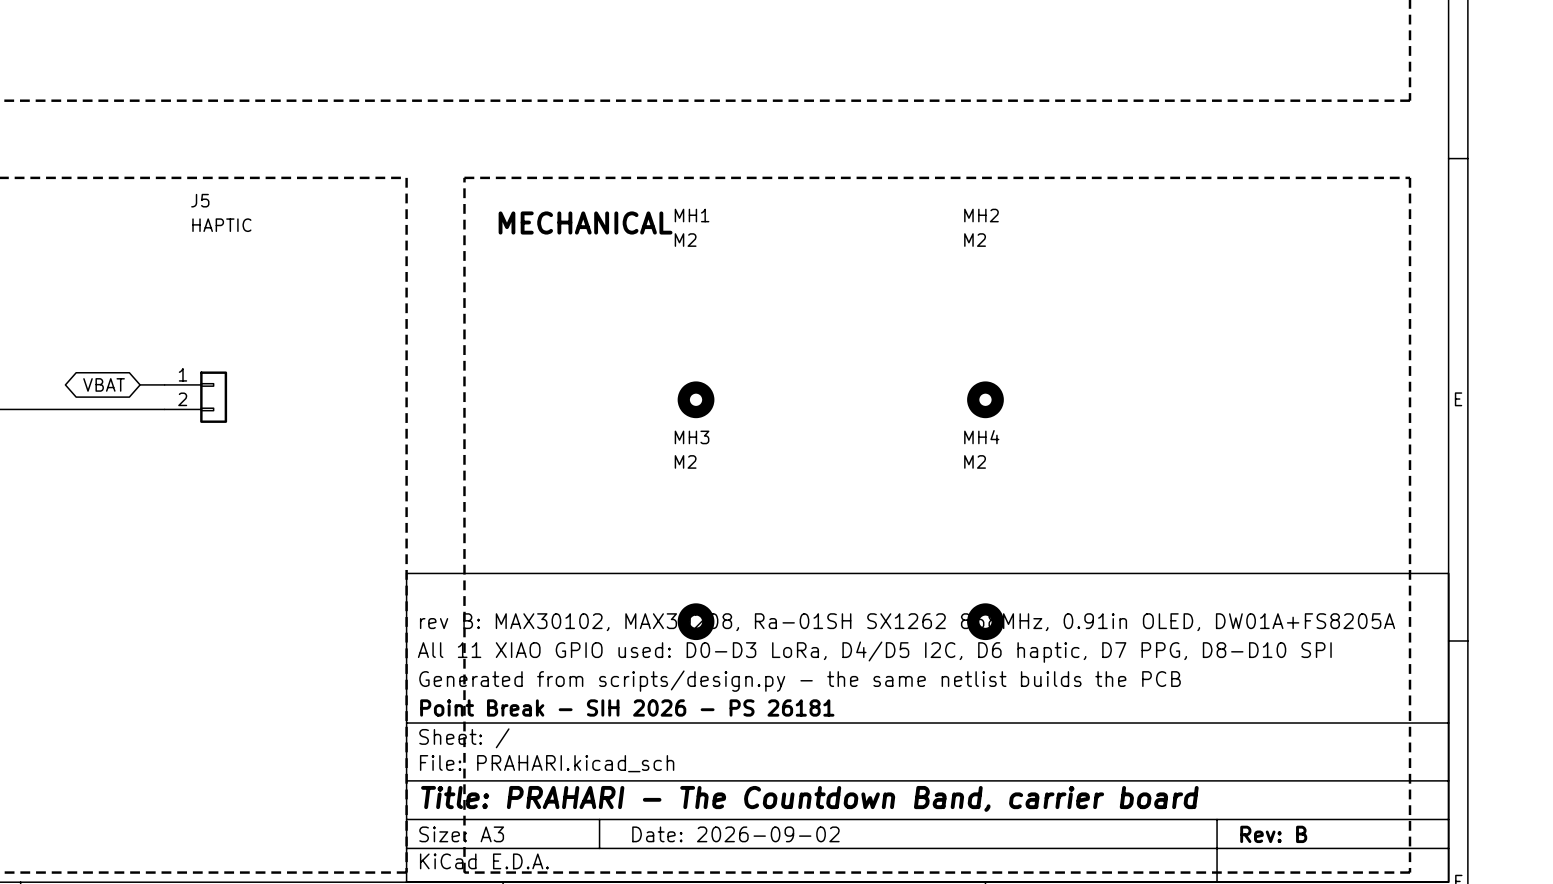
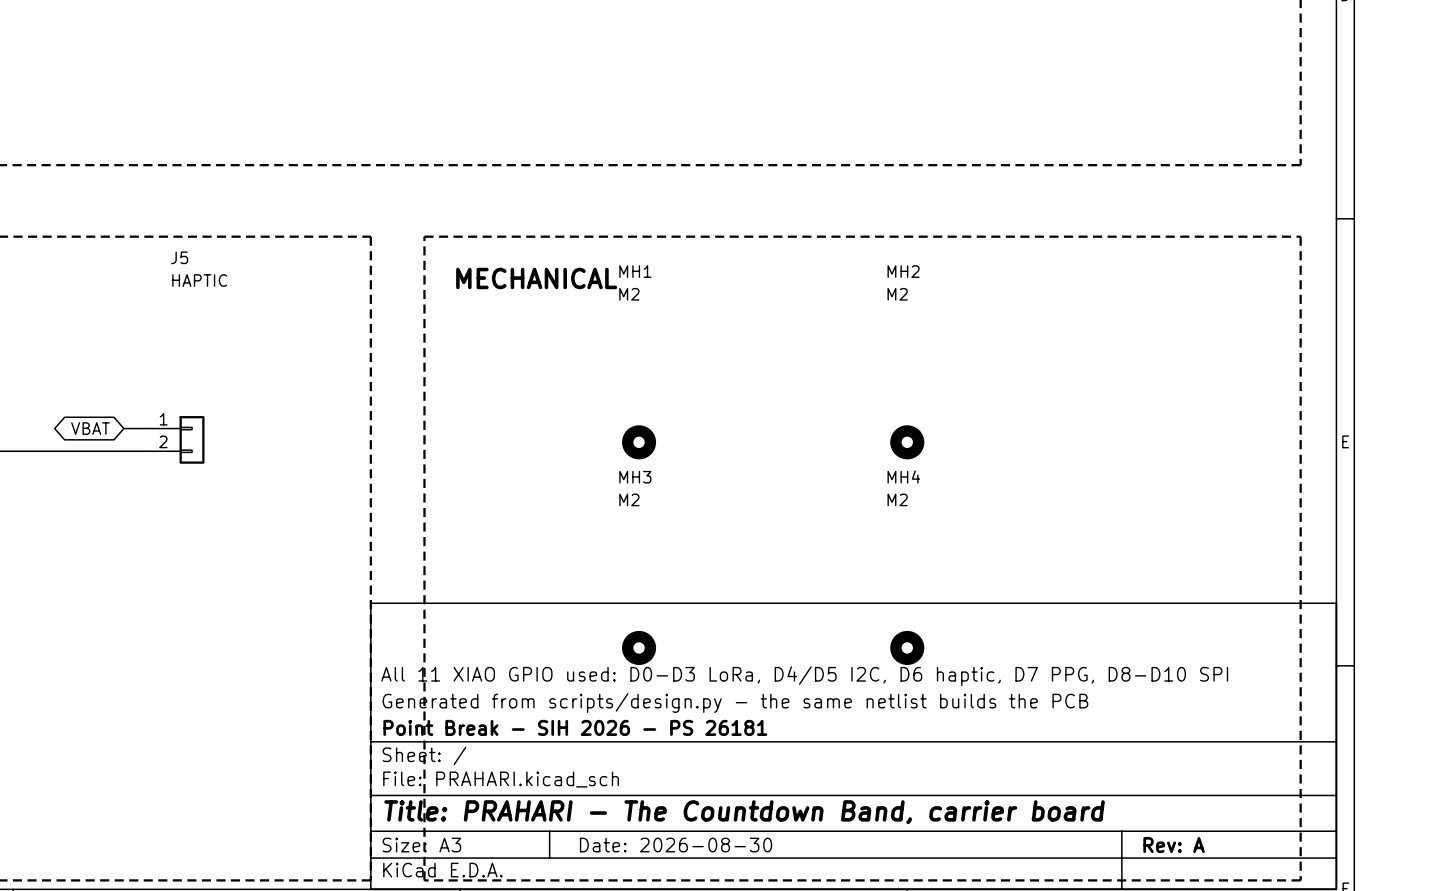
title block: rev B: MAX30102, MAX30208, Ra-01SH SX1262 868MHz, 0.91in OLED, DW01A+FS8205A (907, 622) -> none
title block: Date: 2026-09-02 (735, 834) -> Date: 2026-08-30 (676, 845)
title block: Rev: B (1273, 834) -> Rev: A (1174, 845)

